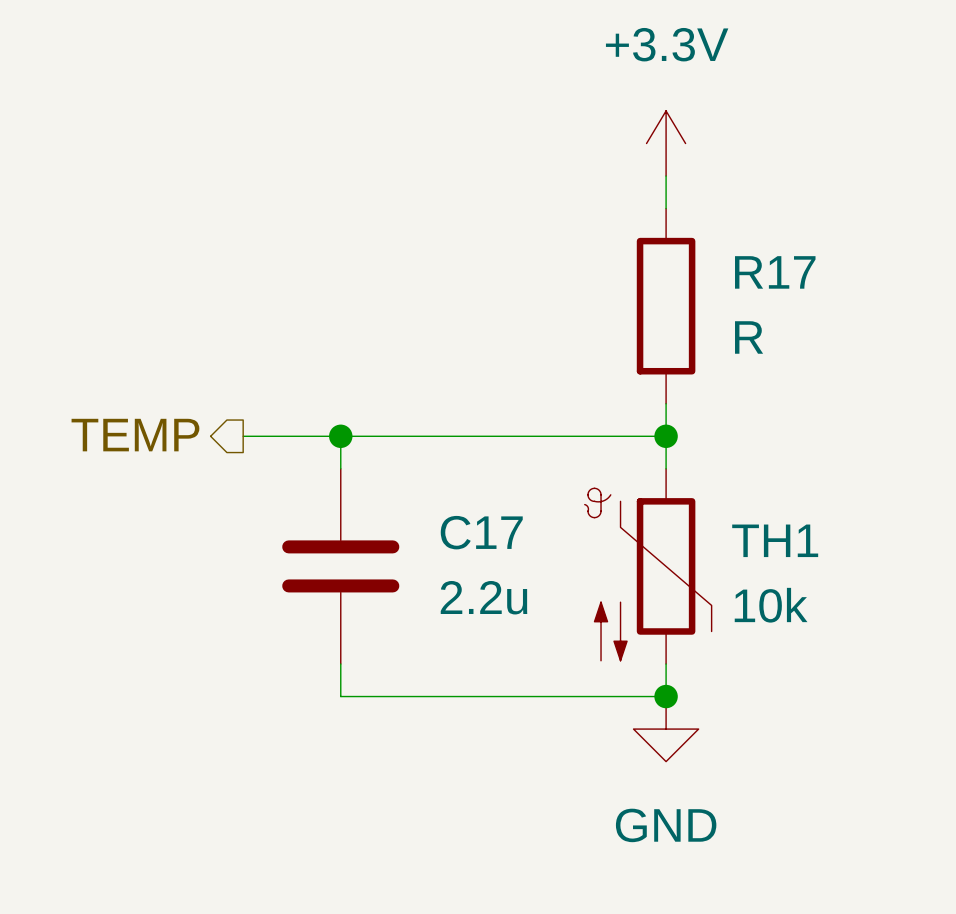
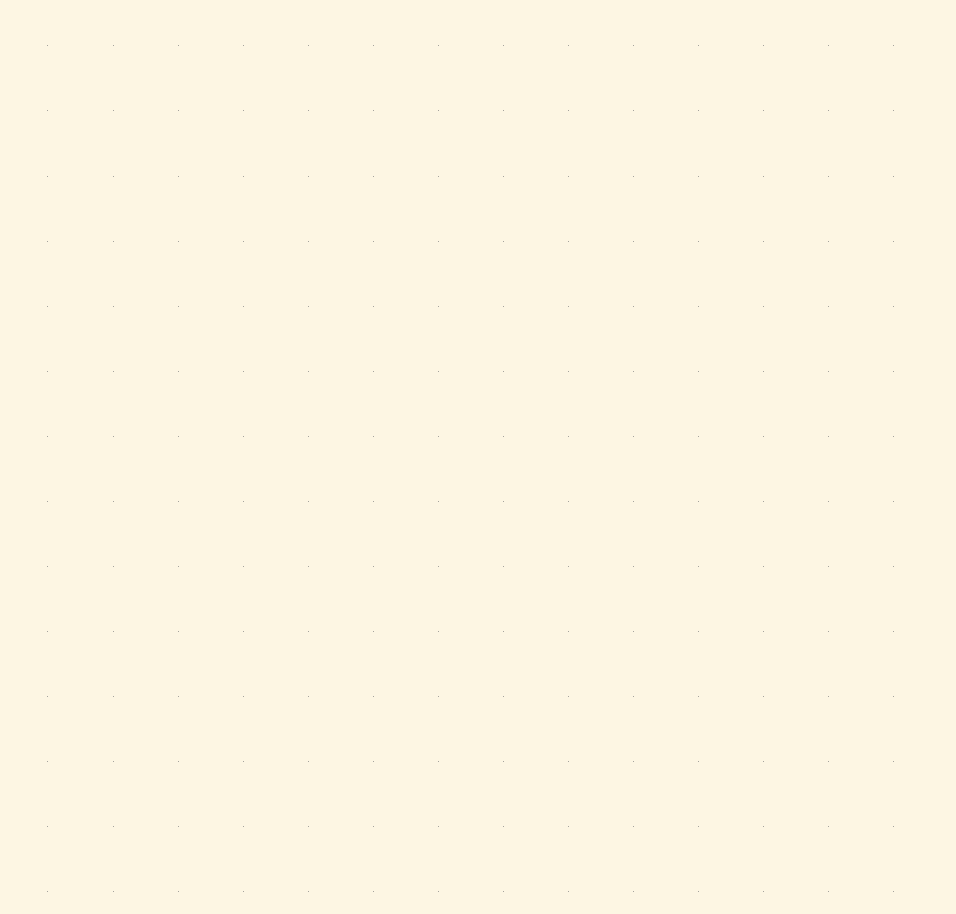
power symbol: +3.3V (666, 143) -> none
wire: (666, 176) (666, 208) -> none
R17: R (666, 306) -> none
wire: (666, 403) (666, 468) -> none
hierarchical label: TEMP (135, 435) -> none
wire: (243, 436) (666, 436) -> none
wire: (340, 436) (340, 468) -> none
junction: (340, 436) -> none
junction: (666, 436) -> none
C17: 2.2u (340, 566) -> none
TH1: 10k (648, 566) -> none
wire: (340, 664) (340, 696) (666, 696) (666, 664) -> none
junction: (666, 696) -> none
power symbol: GND (666, 729) -> none

